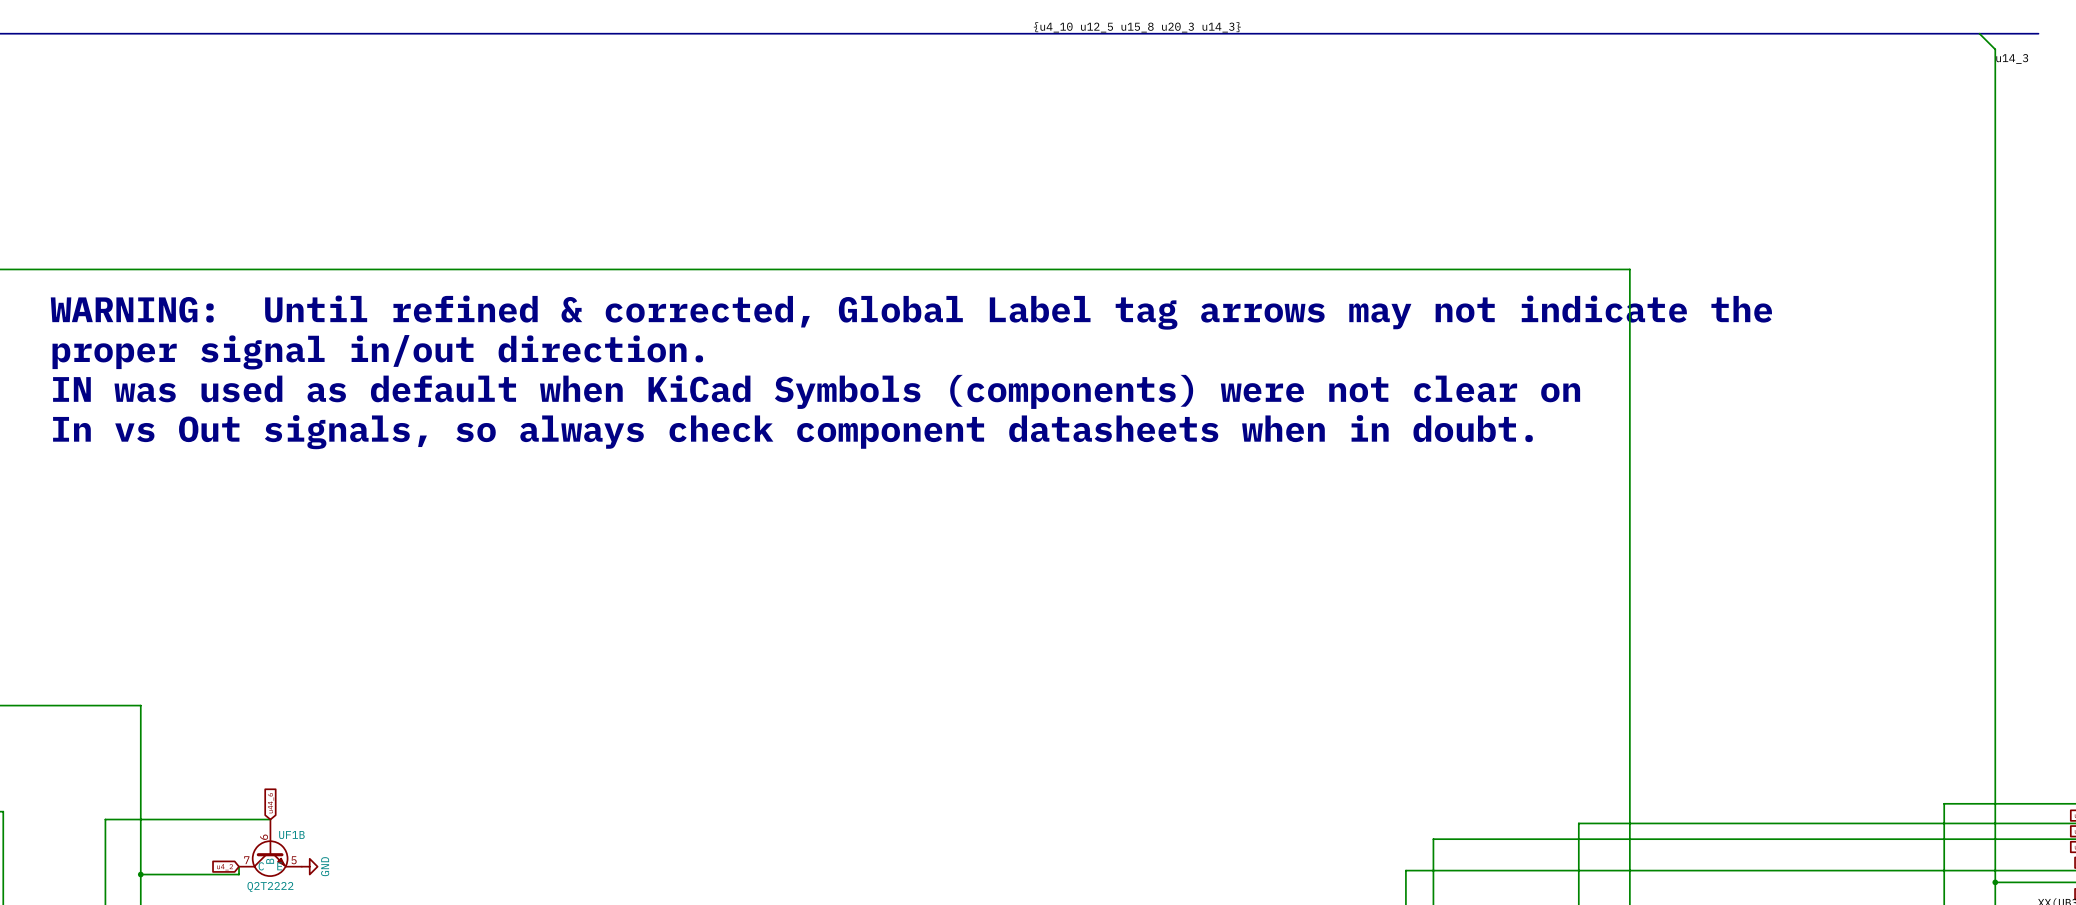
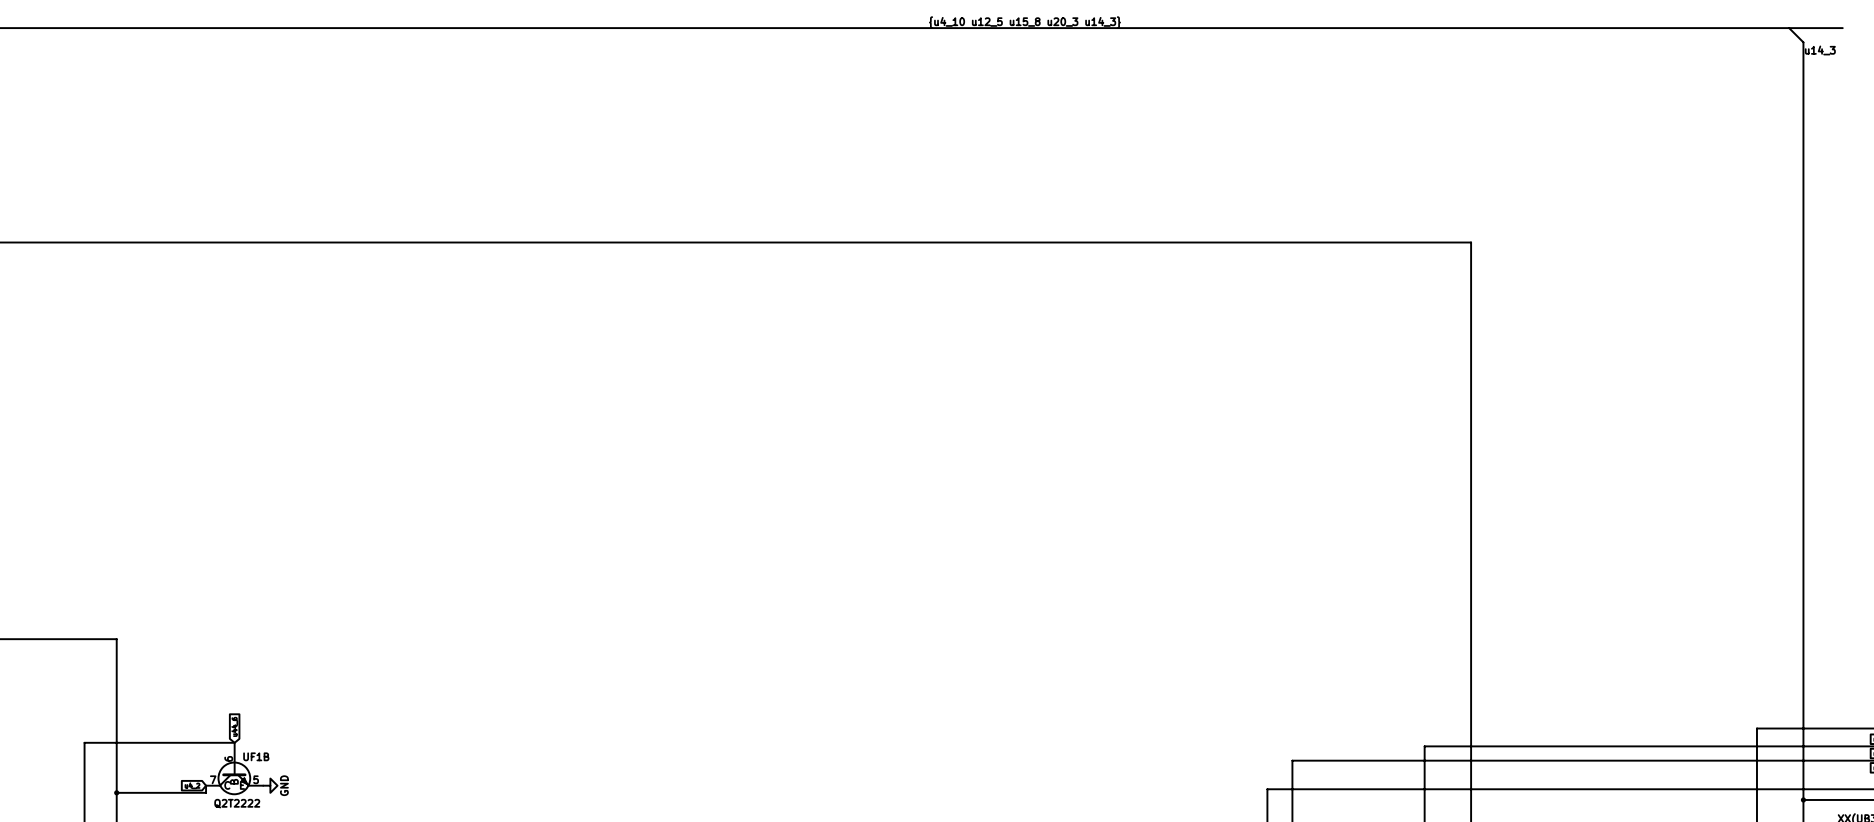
text: WARNING: Until refined & corrected, Global Label tag arrows may not indicate the (911, 312) -> none
text: proper signal in/out direction. (377, 352) -> none
text: IN was used as default when KiCad Symbols (components) were not clear on (816, 391) -> none
text: In vs Out signals, so always check component datasheets when in doubt. (792, 432) -> none

